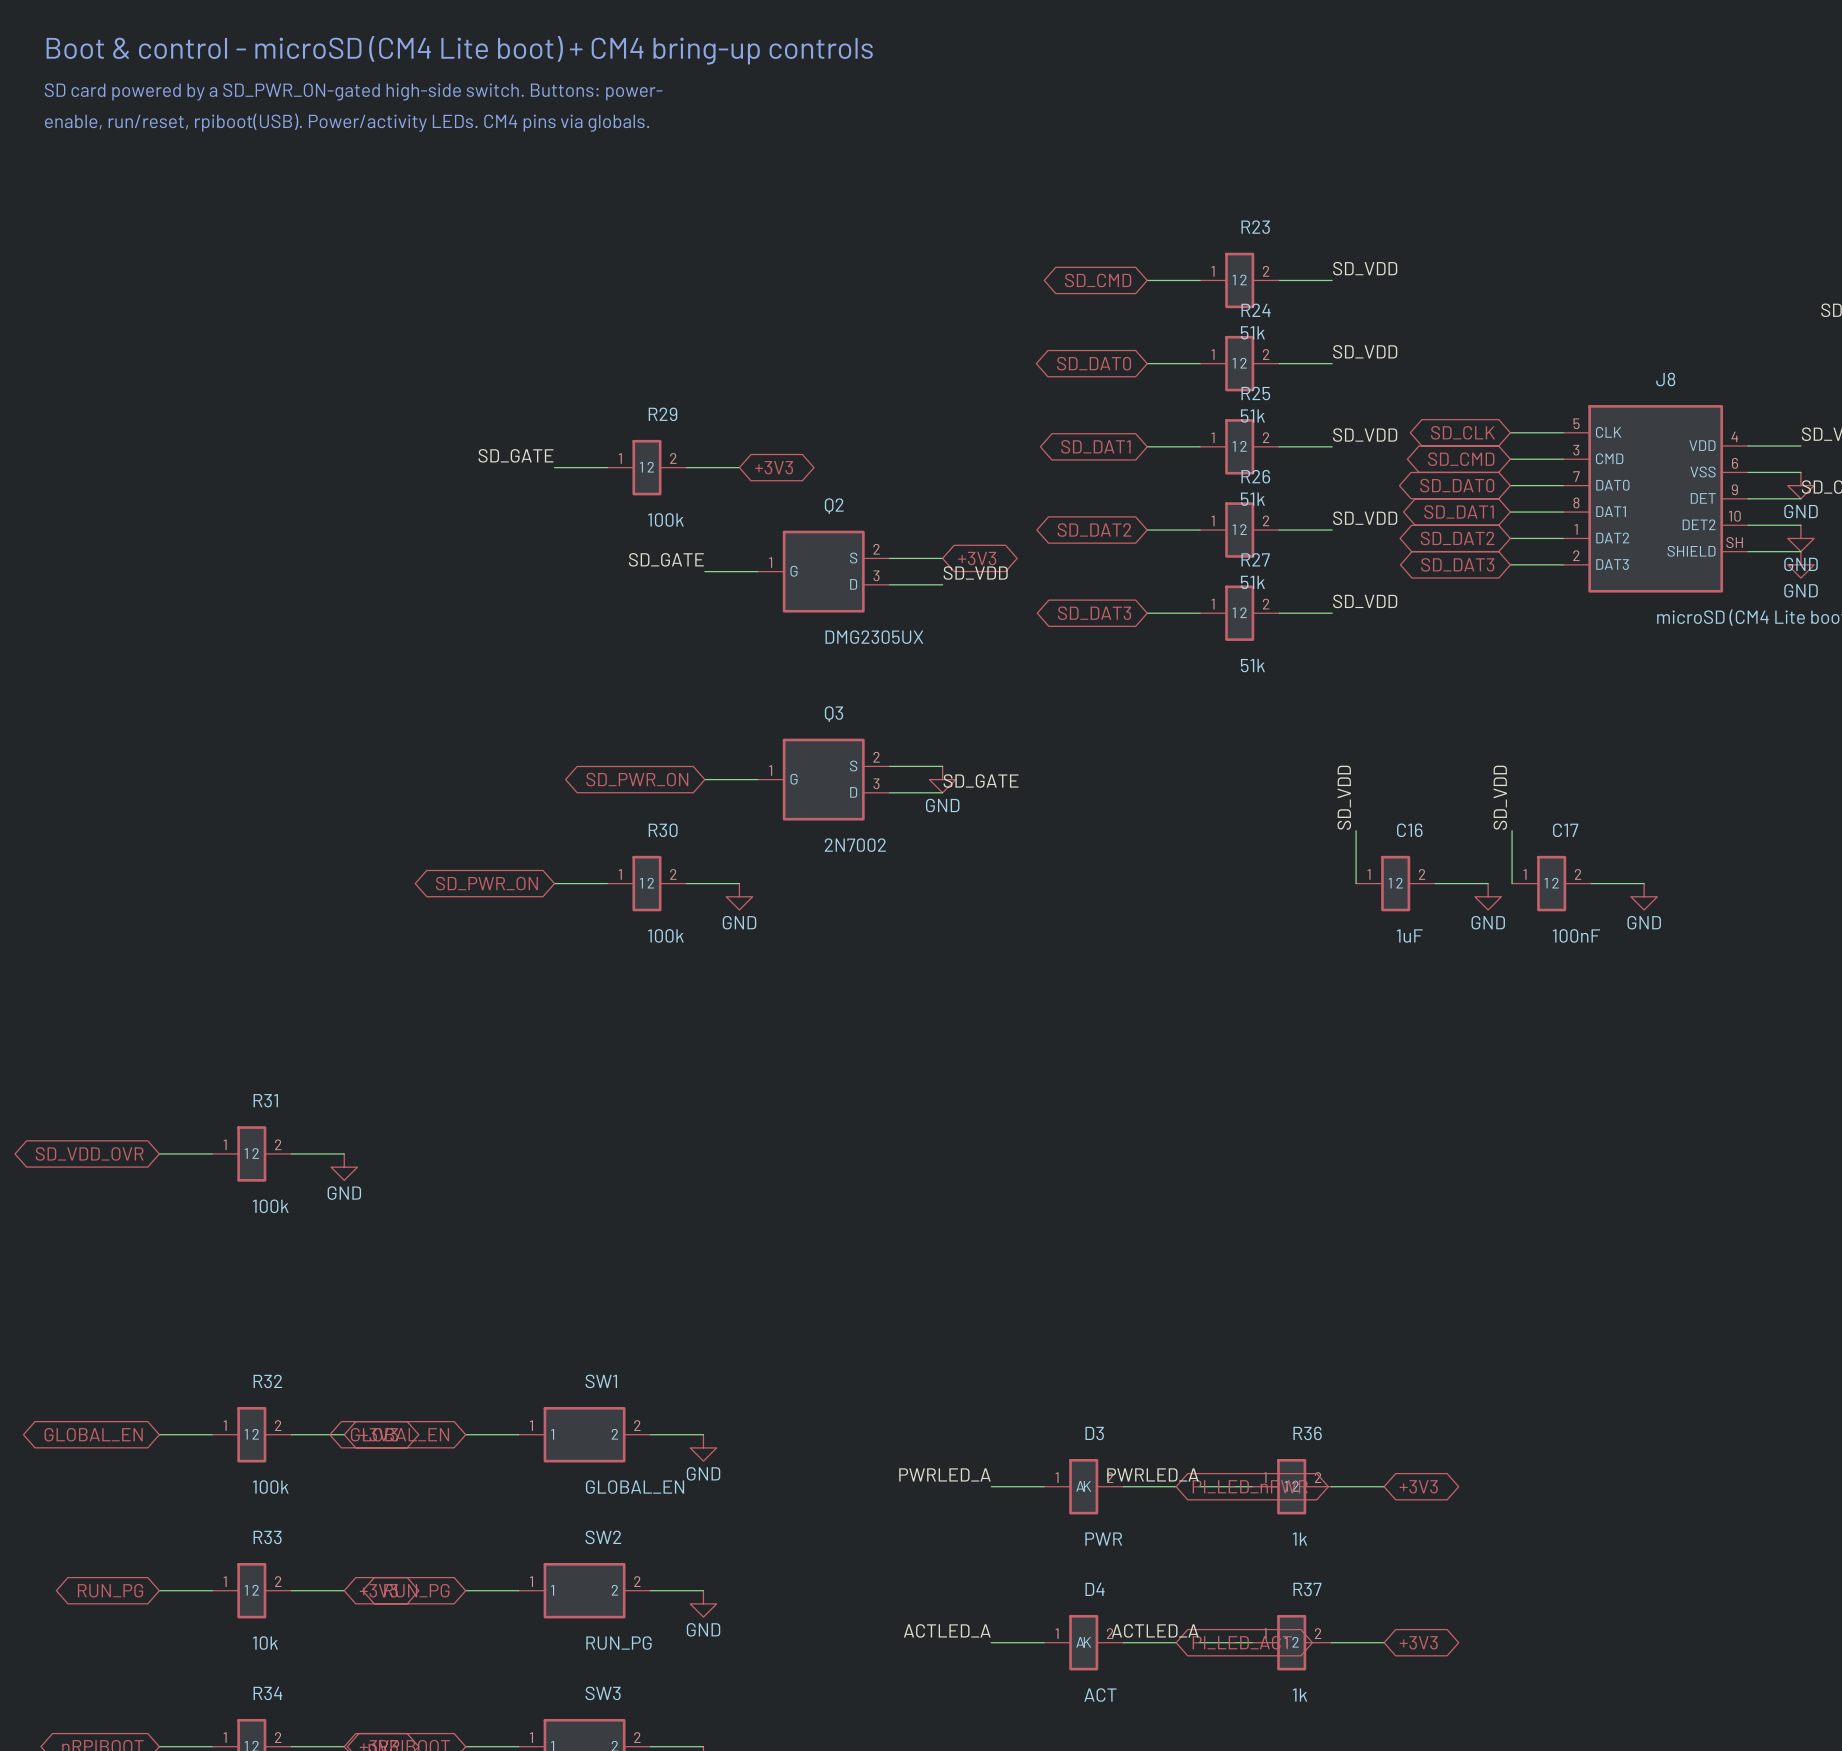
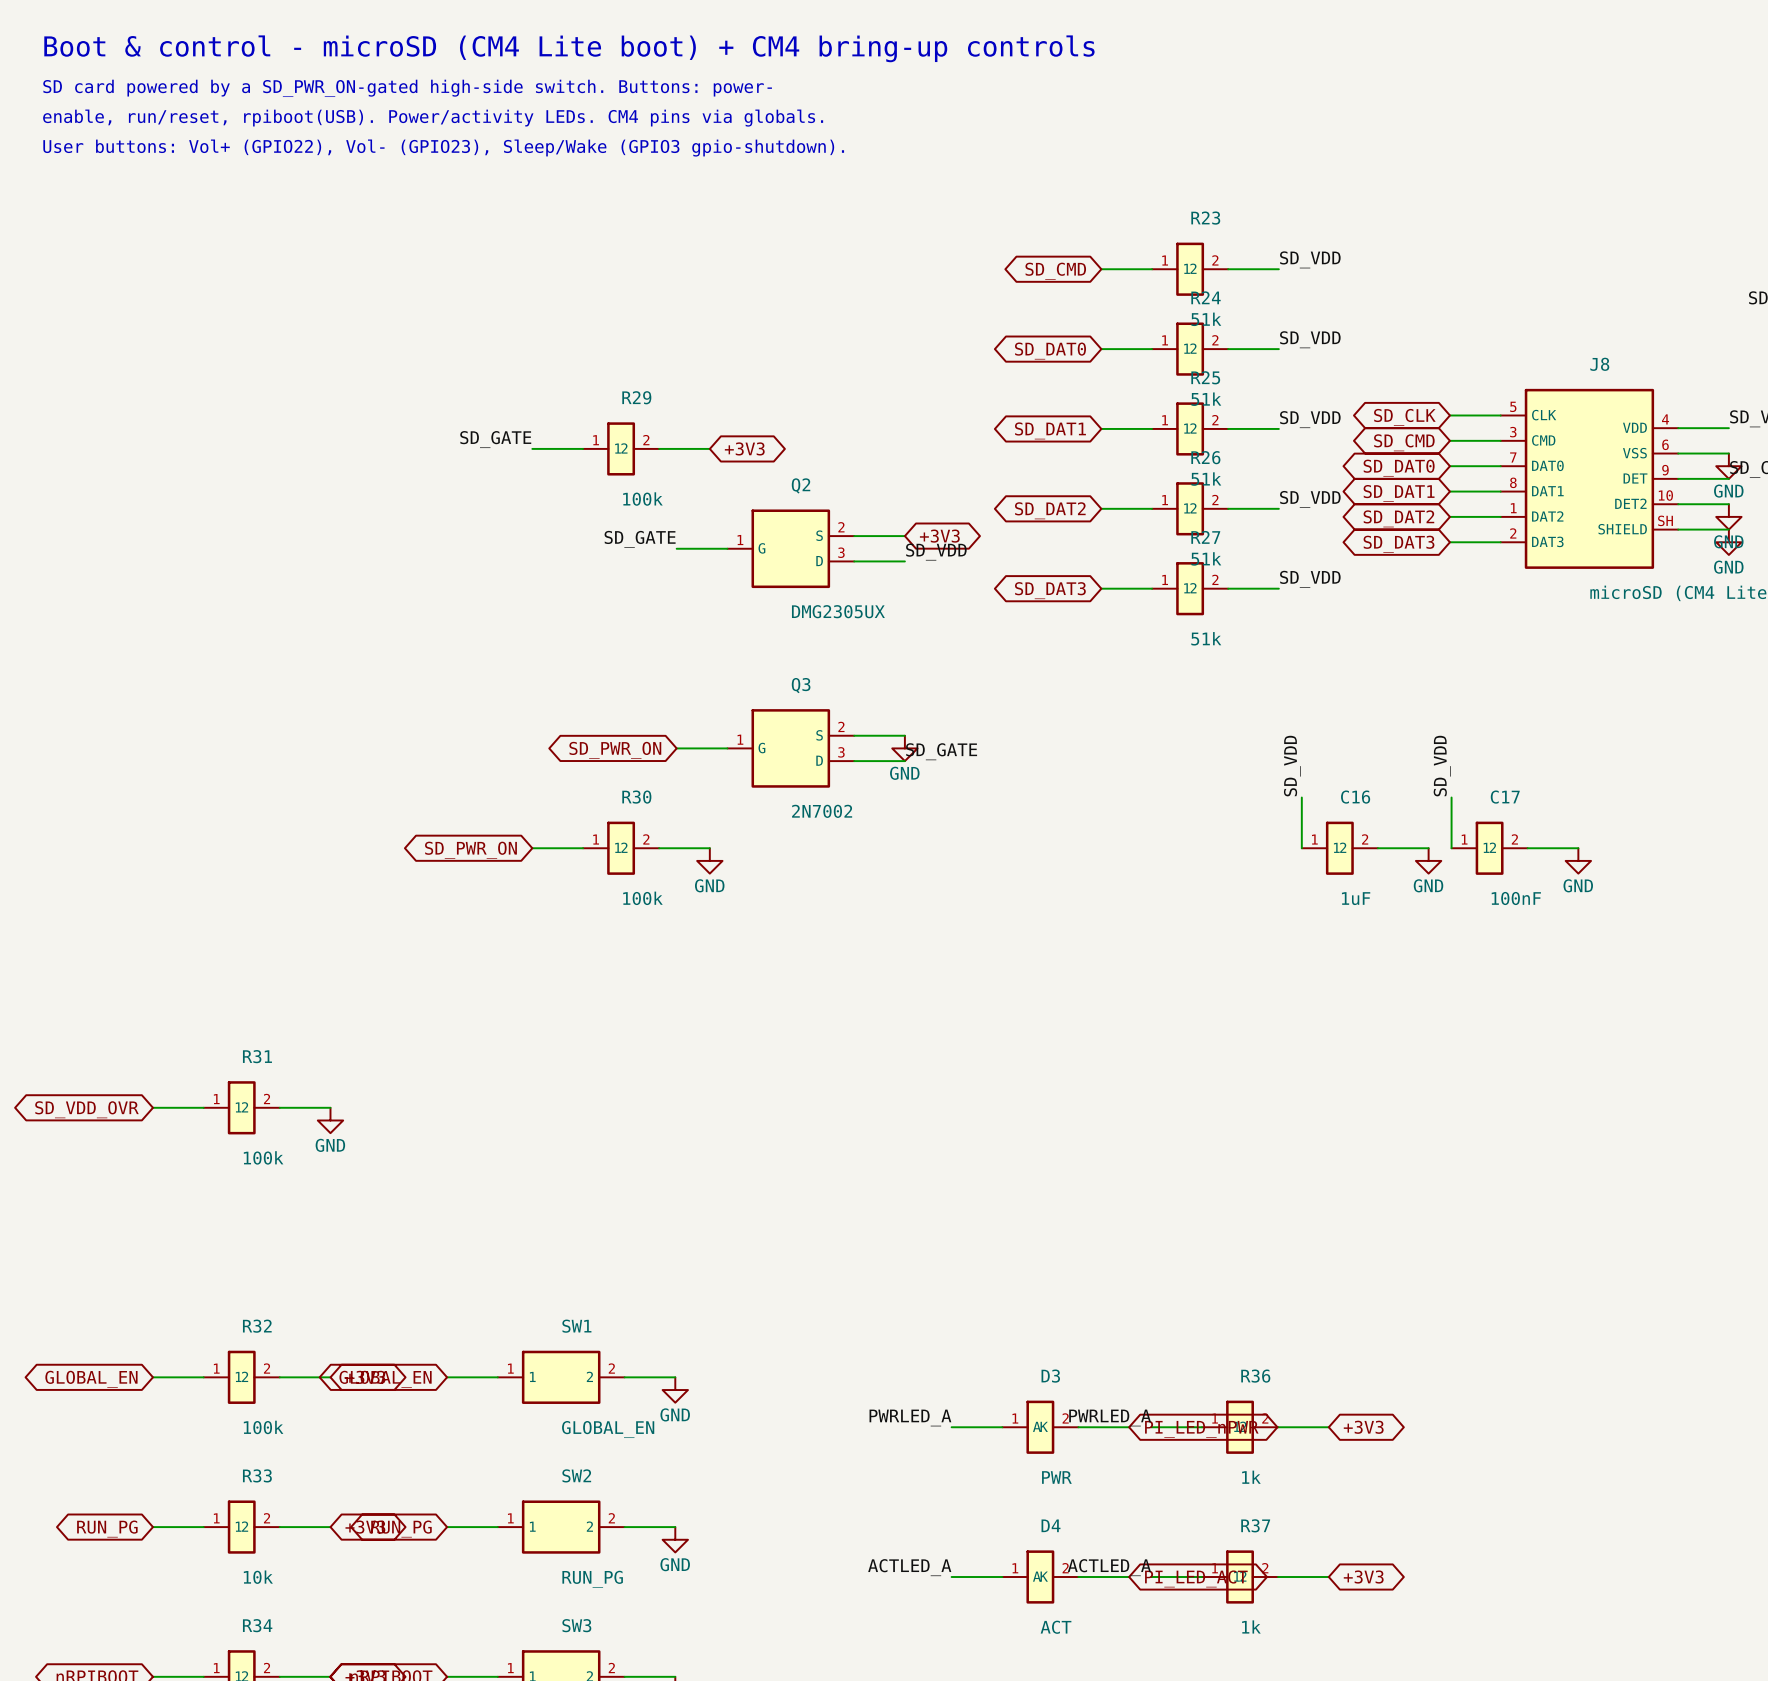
text: none -> User buttons: Vol+ (GPIO22), Vol- (GPIO23), Sleep/Wake (GPIO3 gpio-shutdown). (443, 148)

